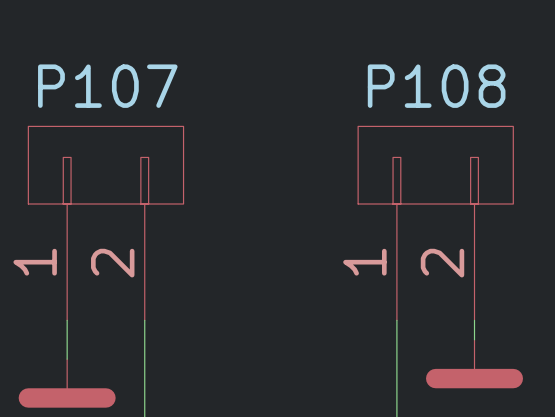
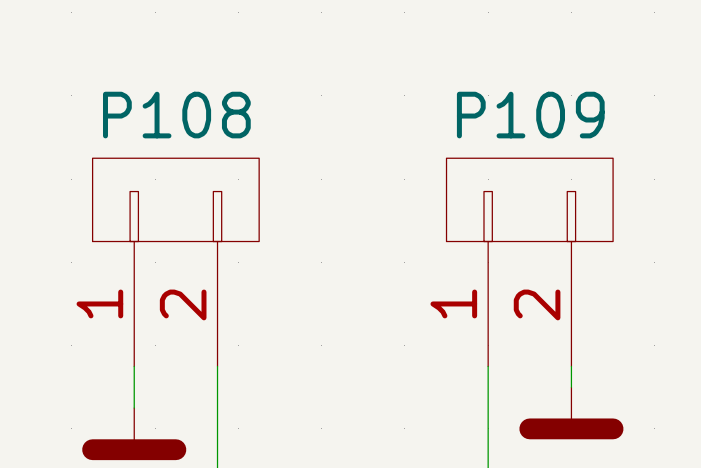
P107 name: P107 (107, 86) -> P108 (176, 115)
P108 name: P108 (436, 86) -> P109 (530, 115)

